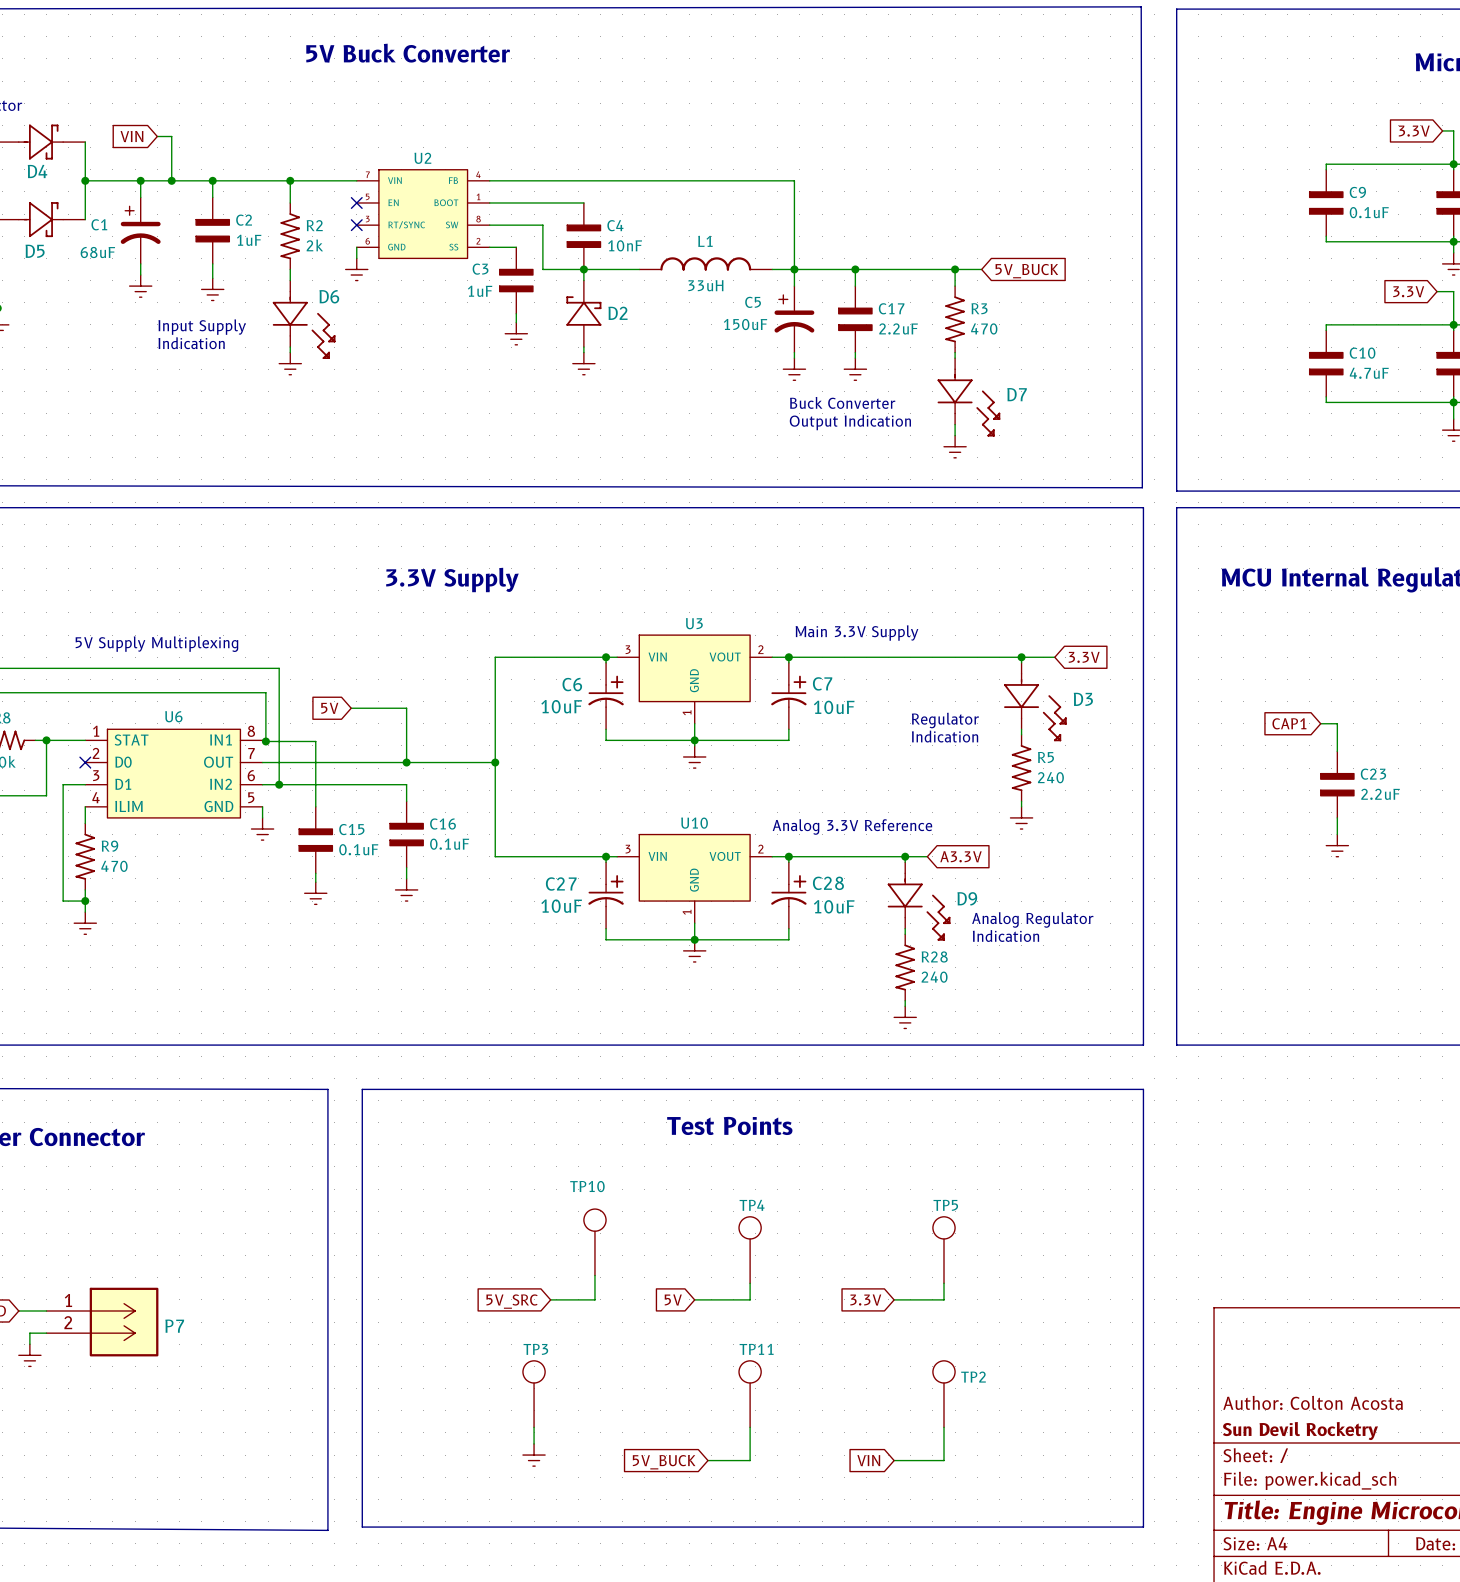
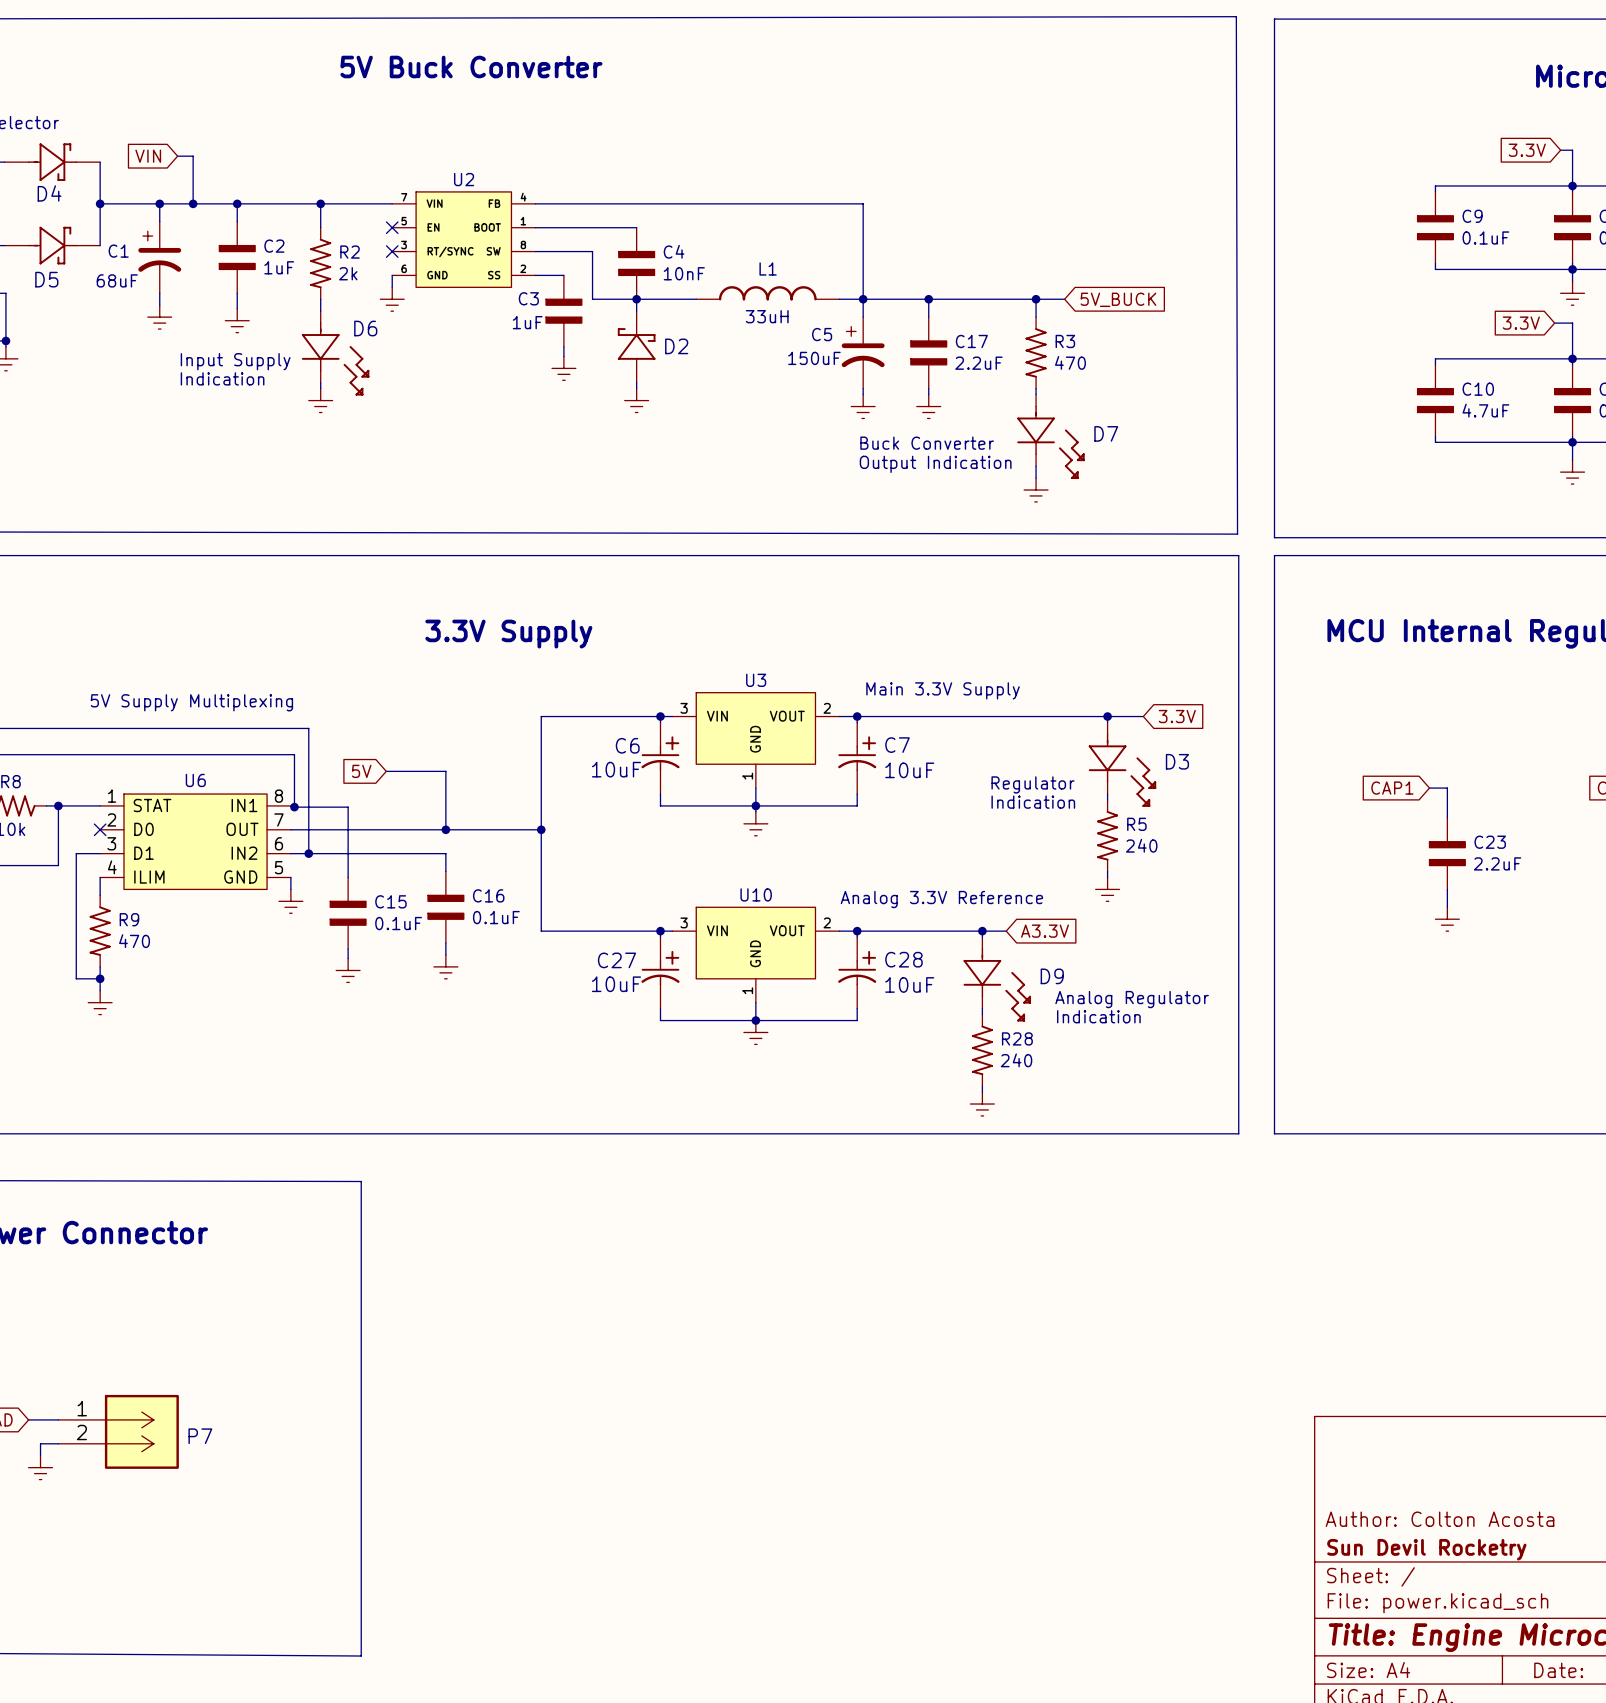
line: (362, 1089) (362, 1527) (1143, 1527) (1143, 1089) (362, 1089) -> none
text: Test Points (729, 1125) -> none
TP10: (594, 1242) -> none
TP4: (750, 1250) -> none
TP5: (944, 1250) -> none
wire: (594, 1275) (594, 1299) (550, 1299) -> none
wire: (750, 1283) (750, 1299) (694, 1299) -> none
wire: (944, 1283) (944, 1299) (894, 1299) -> none
global label: 5V (673, 1299) -> none
global label: 3.3V (865, 1299) -> none
global label: 5V_SRC (512, 1301) -> none
TP3: (534, 1394) -> none
TP11: (750, 1394) -> none
TP2: (944, 1394) -> none
wire: (534, 1427) (534, 1443) -> none
wire: (750, 1427) (750, 1460) (707, 1460) -> none
wire: (944, 1427) (944, 1460) (894, 1460) -> none
power symbol: (534, 1455) -> none
global label: VIN (868, 1460) -> none
global label: 5V_BUCK (664, 1462) -> none

